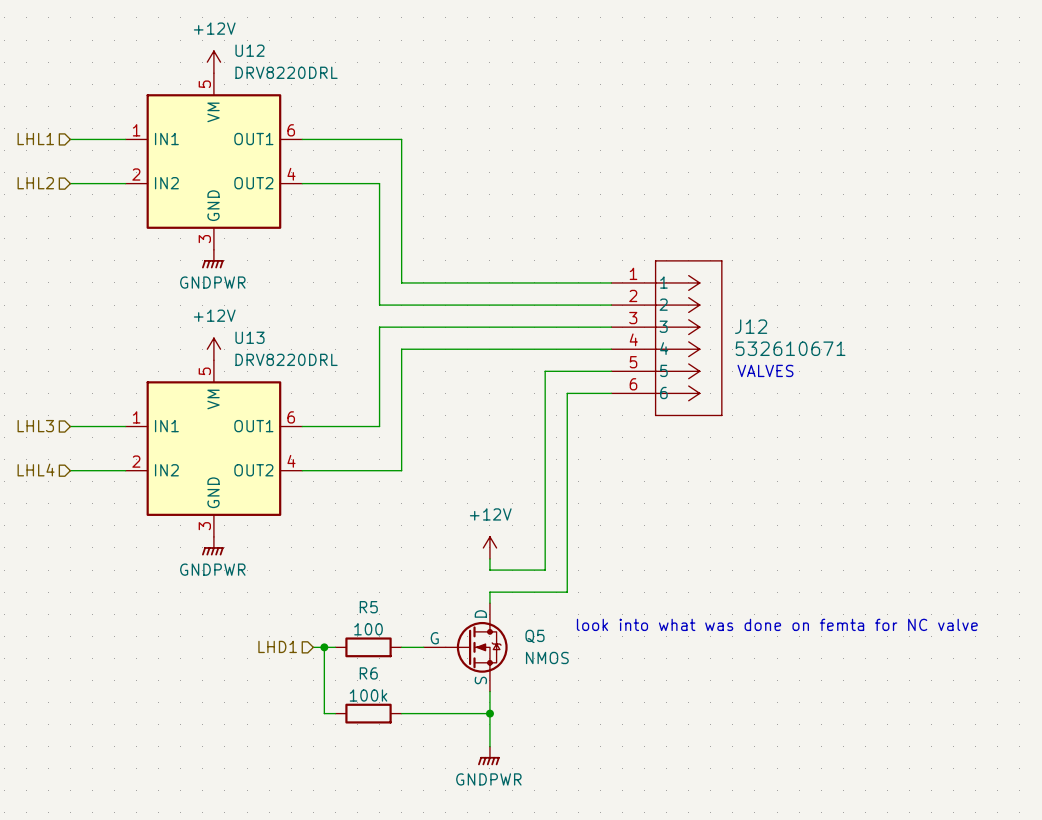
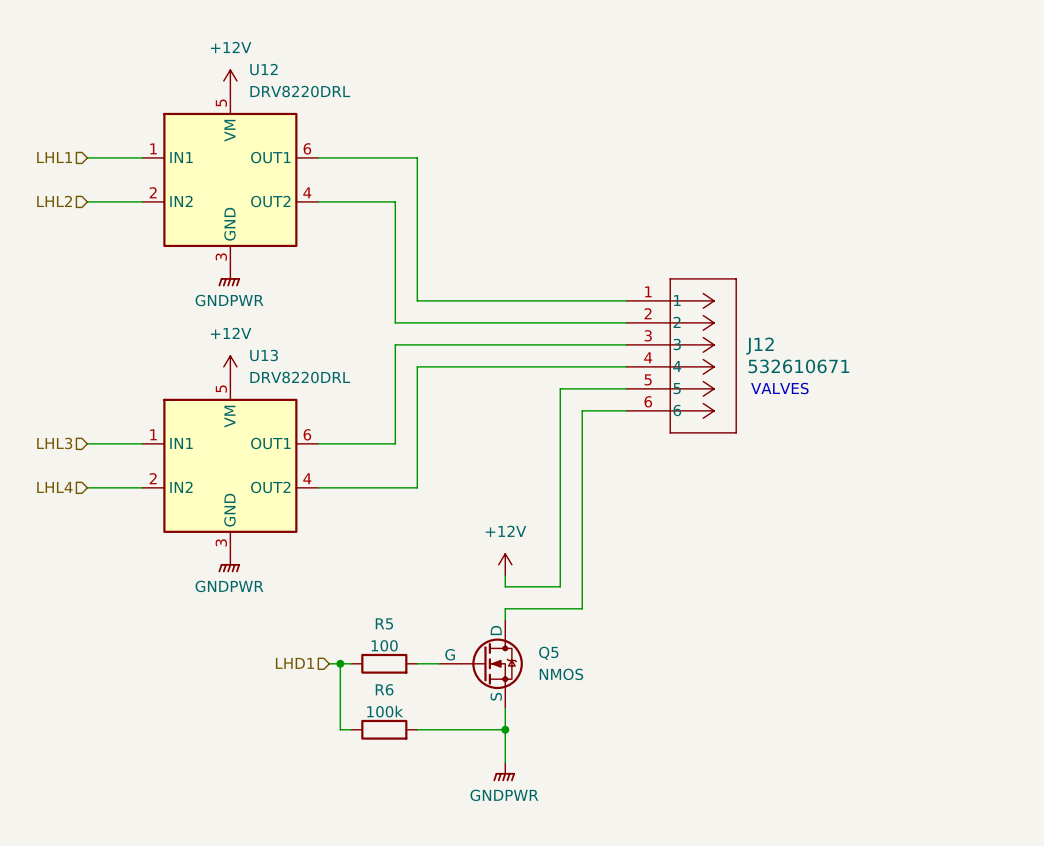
text: look into what was done on femta for NC valve (777, 624) -> none

